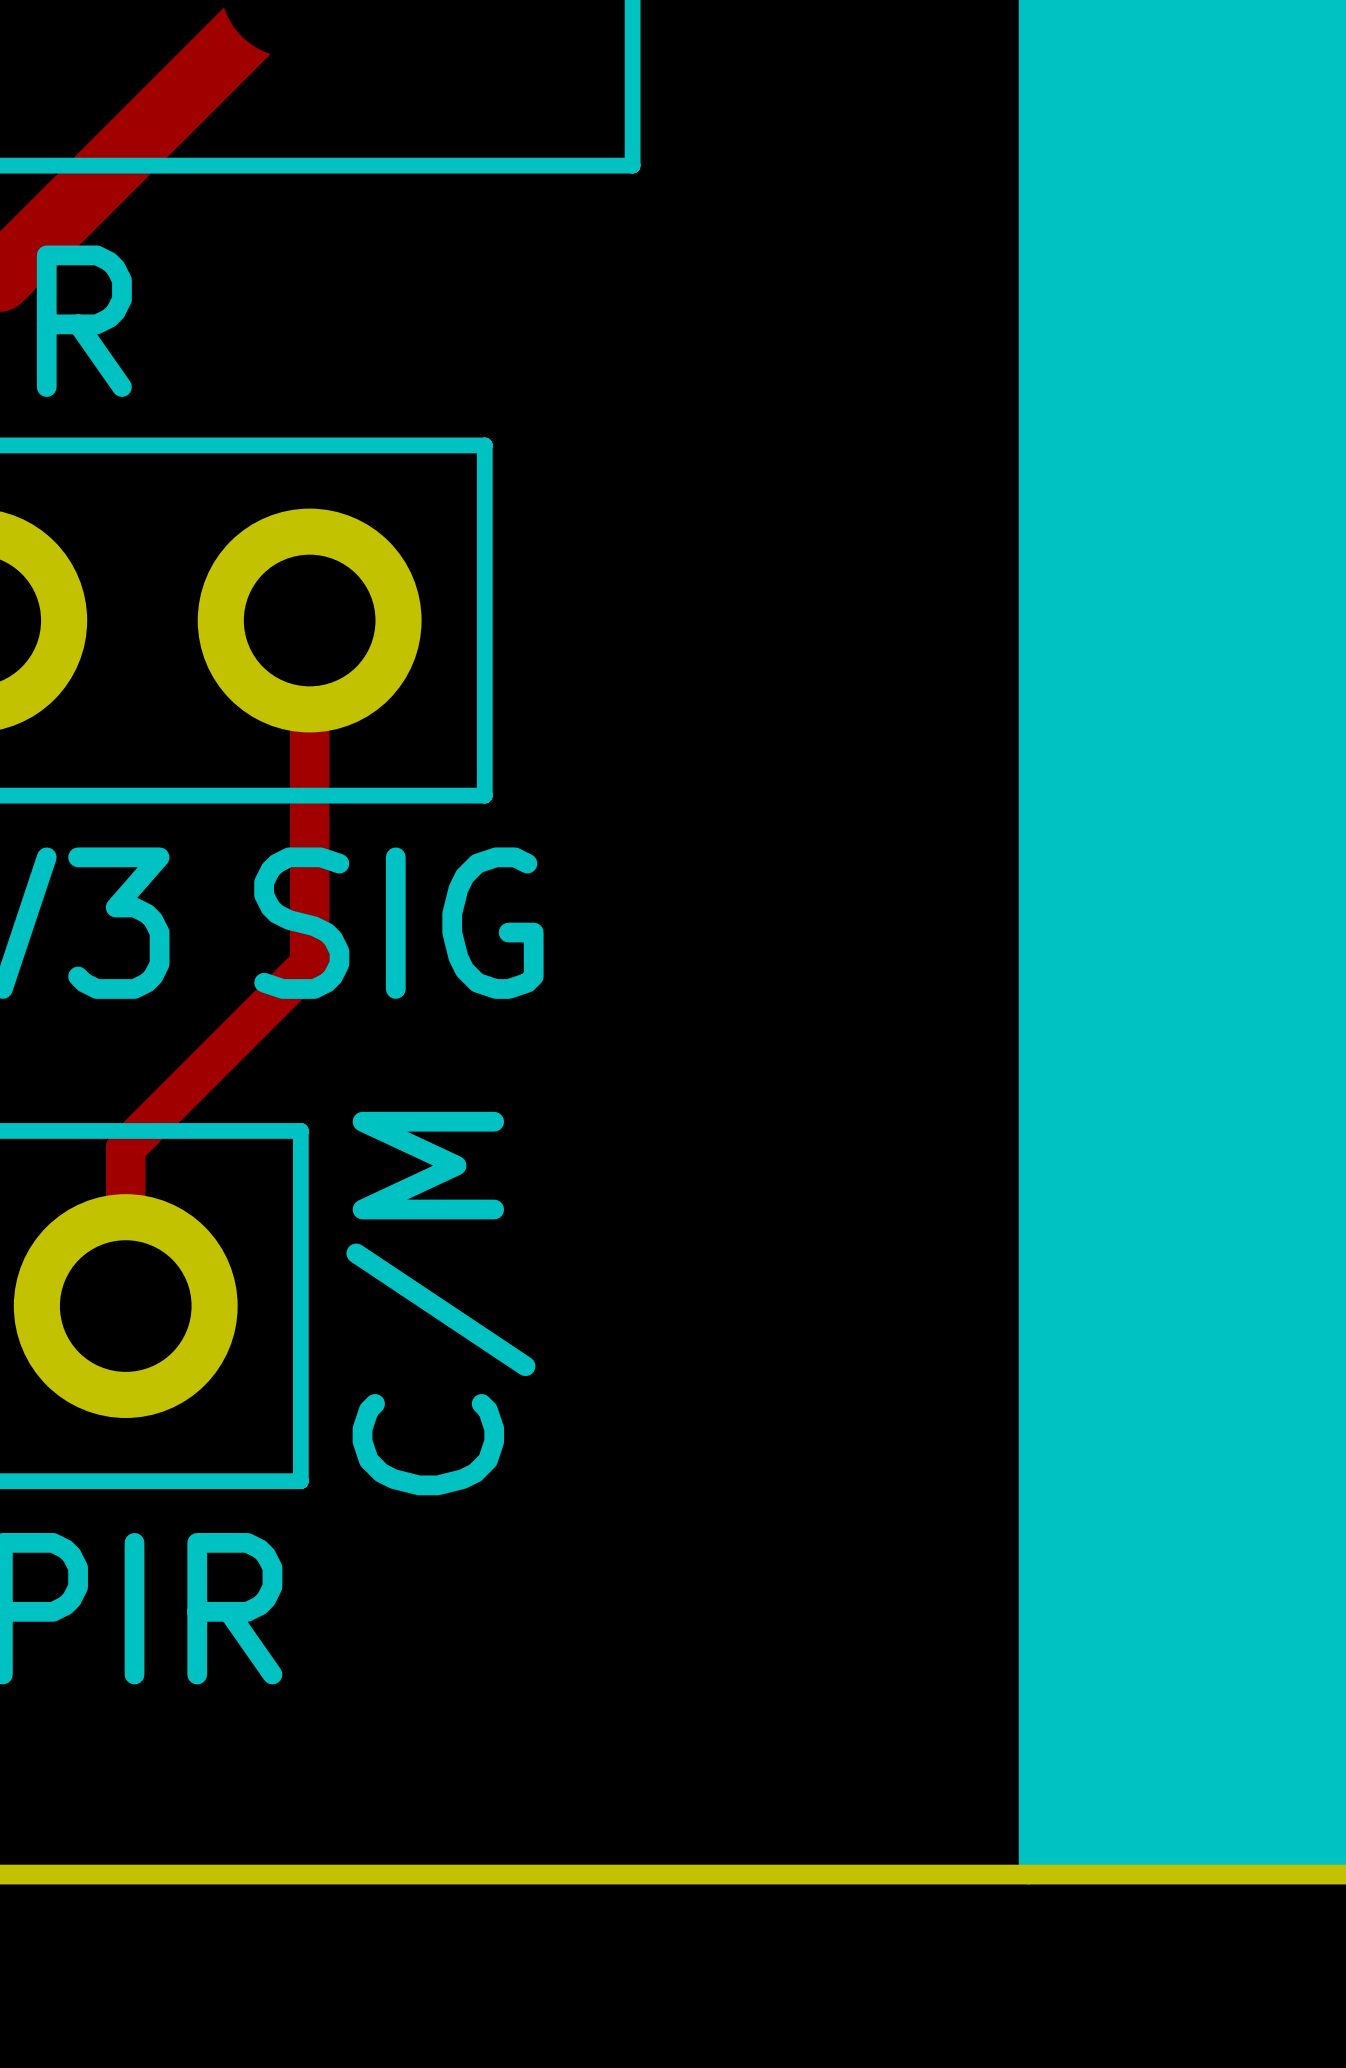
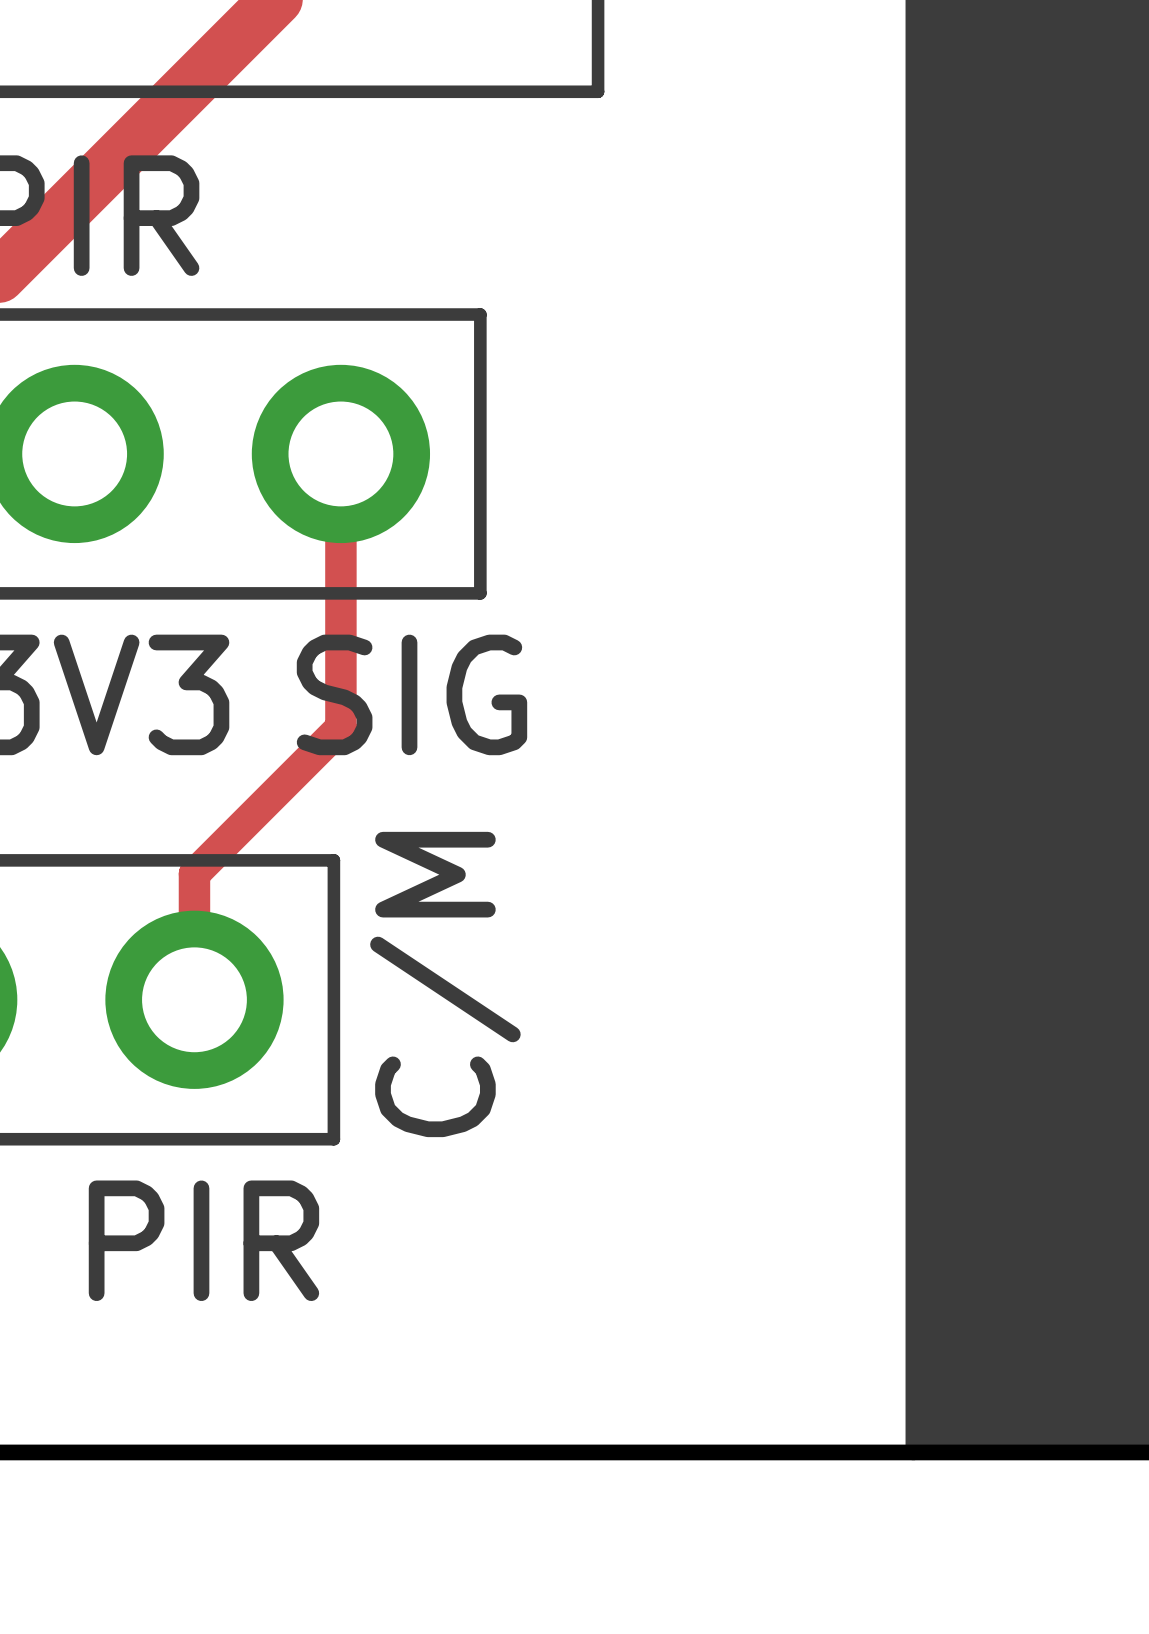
text position: C/M (440, 1303) -> C/M (445, 984)

